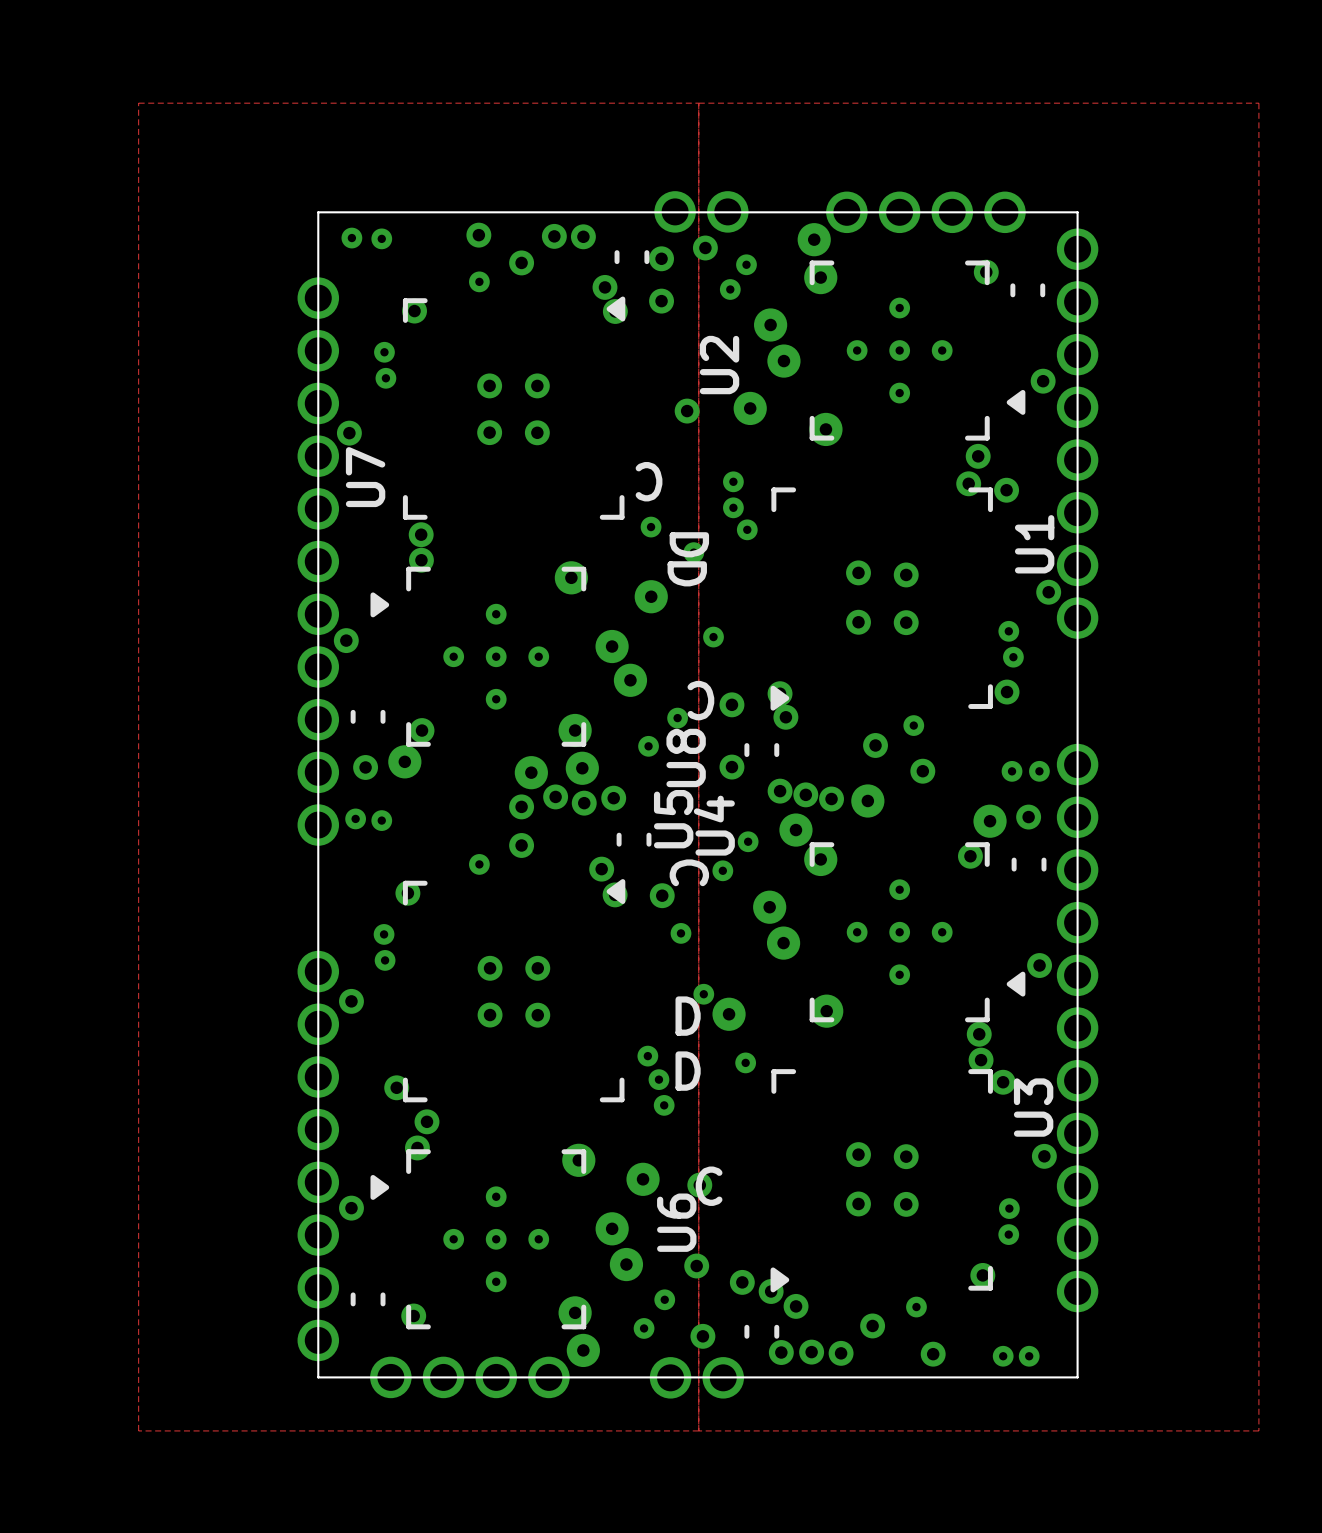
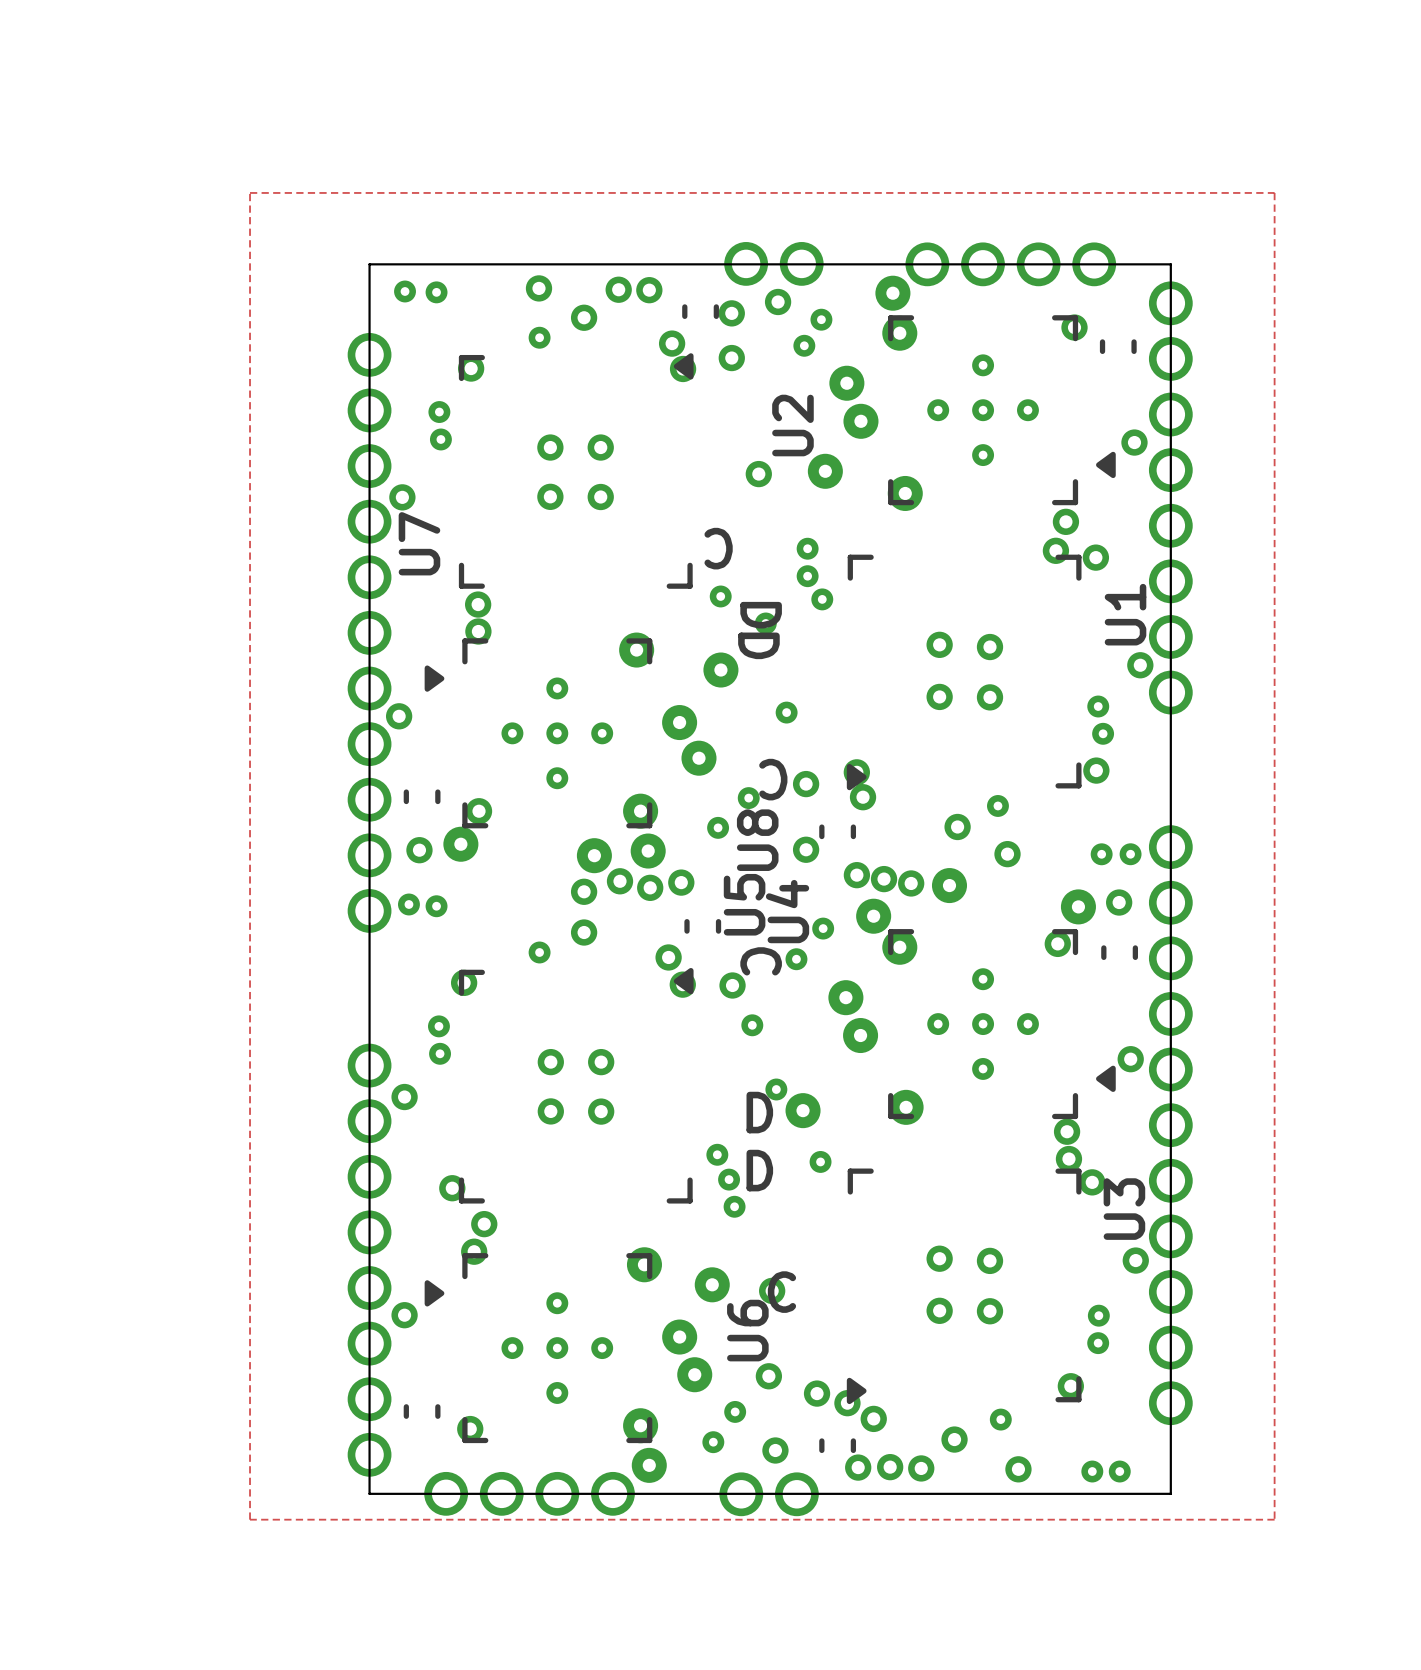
zone outline: (138, 103) (1258, 103) (1258, 1430) (138, 1430) (138, 103) -> (250, 192) (250, 1519) (1274, 1519) (1274, 192) (250, 192)
zone outline: (698, 103) (698, 1430) -> none

